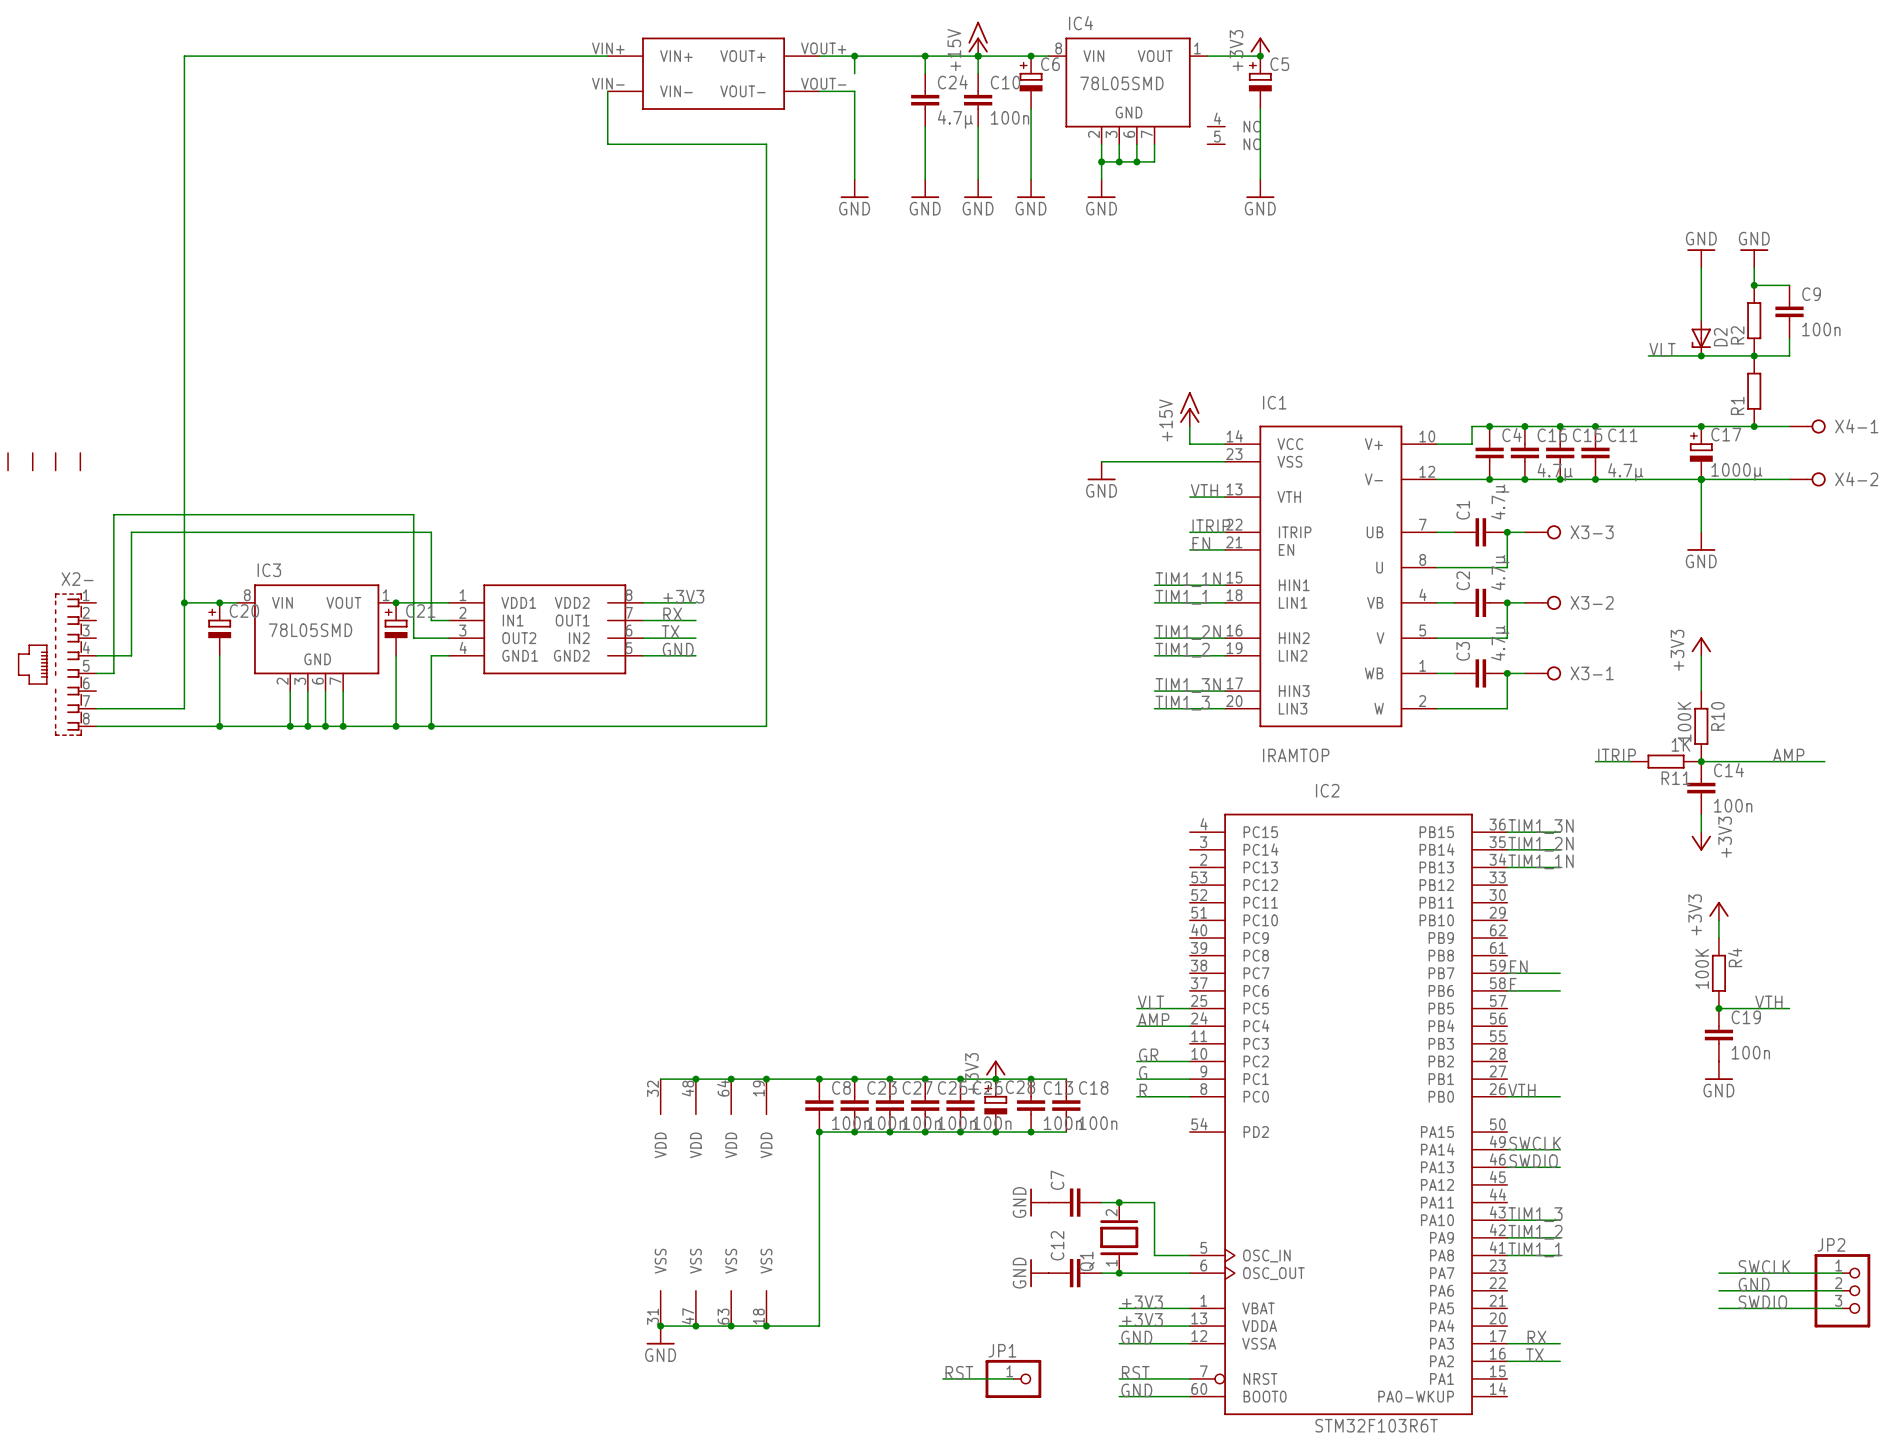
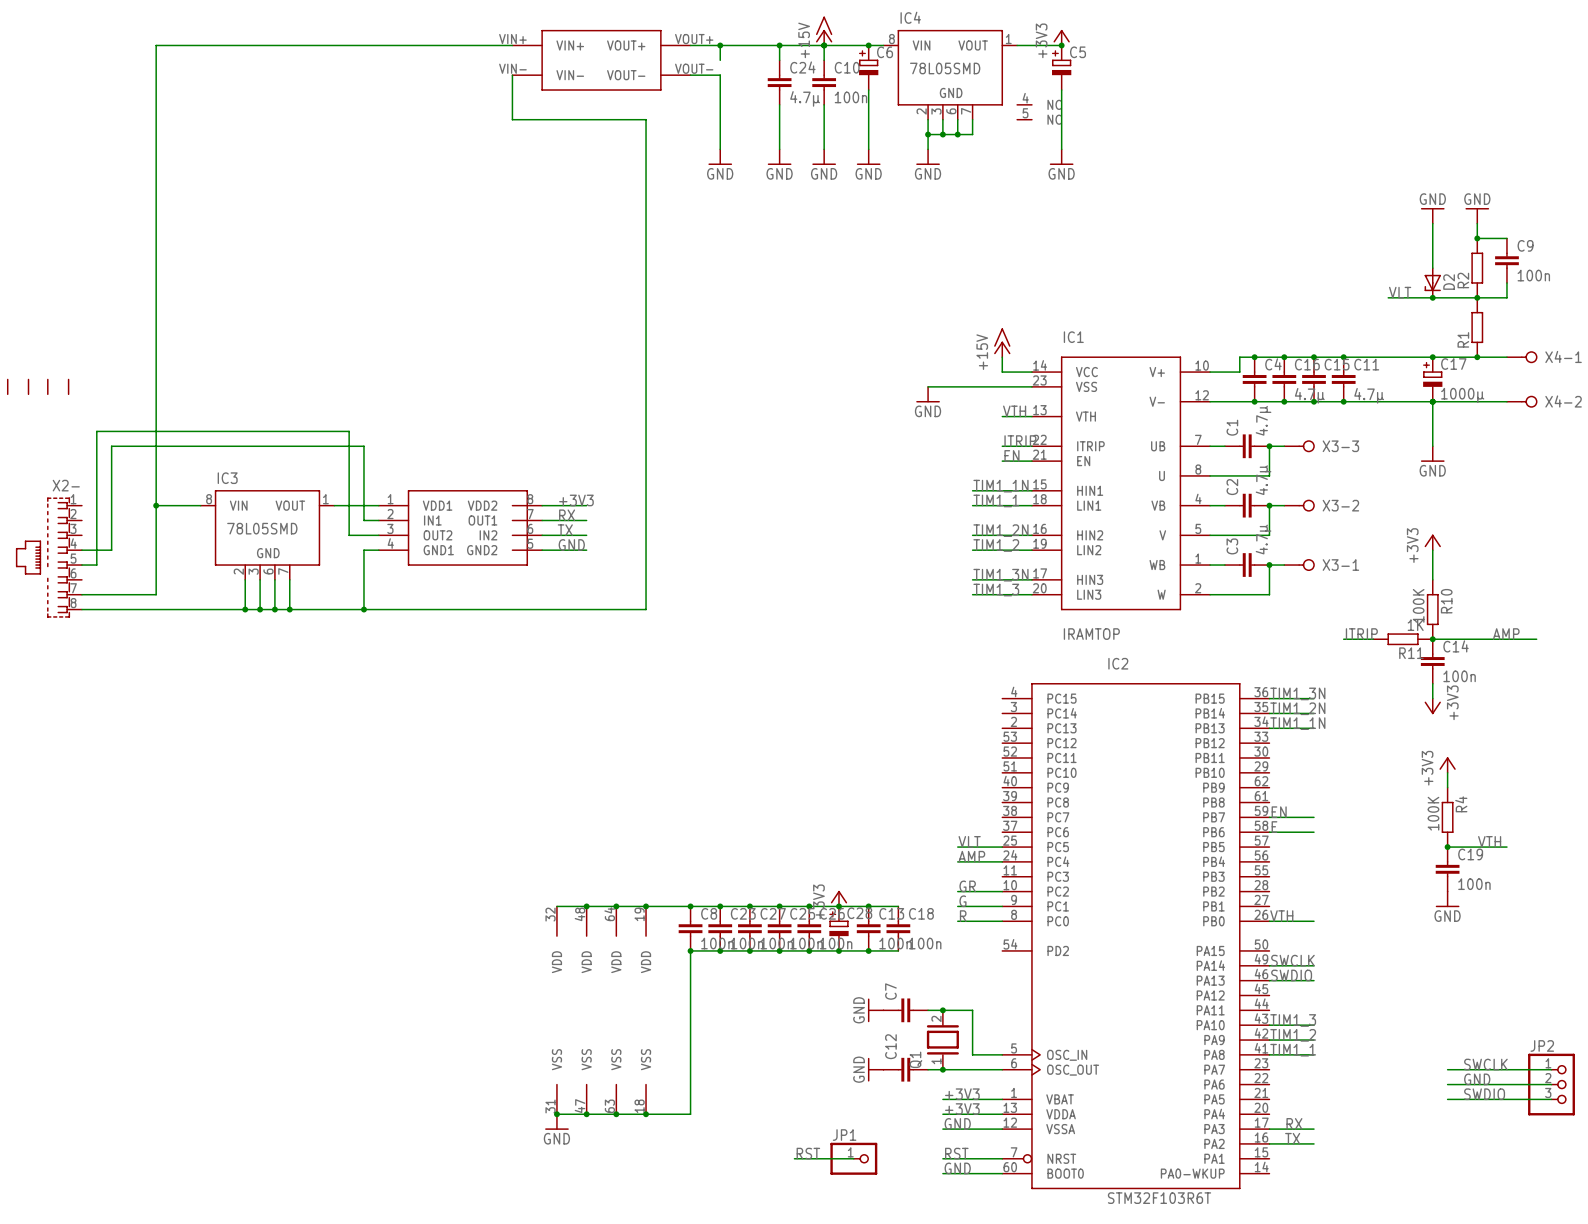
junction: (219, 602) -> none
junction: (396, 602) -> none
C20: (219, 629) -> none
C21: (396, 629) -> none
wire: (219, 655) (219, 726) -> none
wire: (396, 655) (396, 726) -> none
junction: (219, 726) -> none
junction: (396, 726) -> none

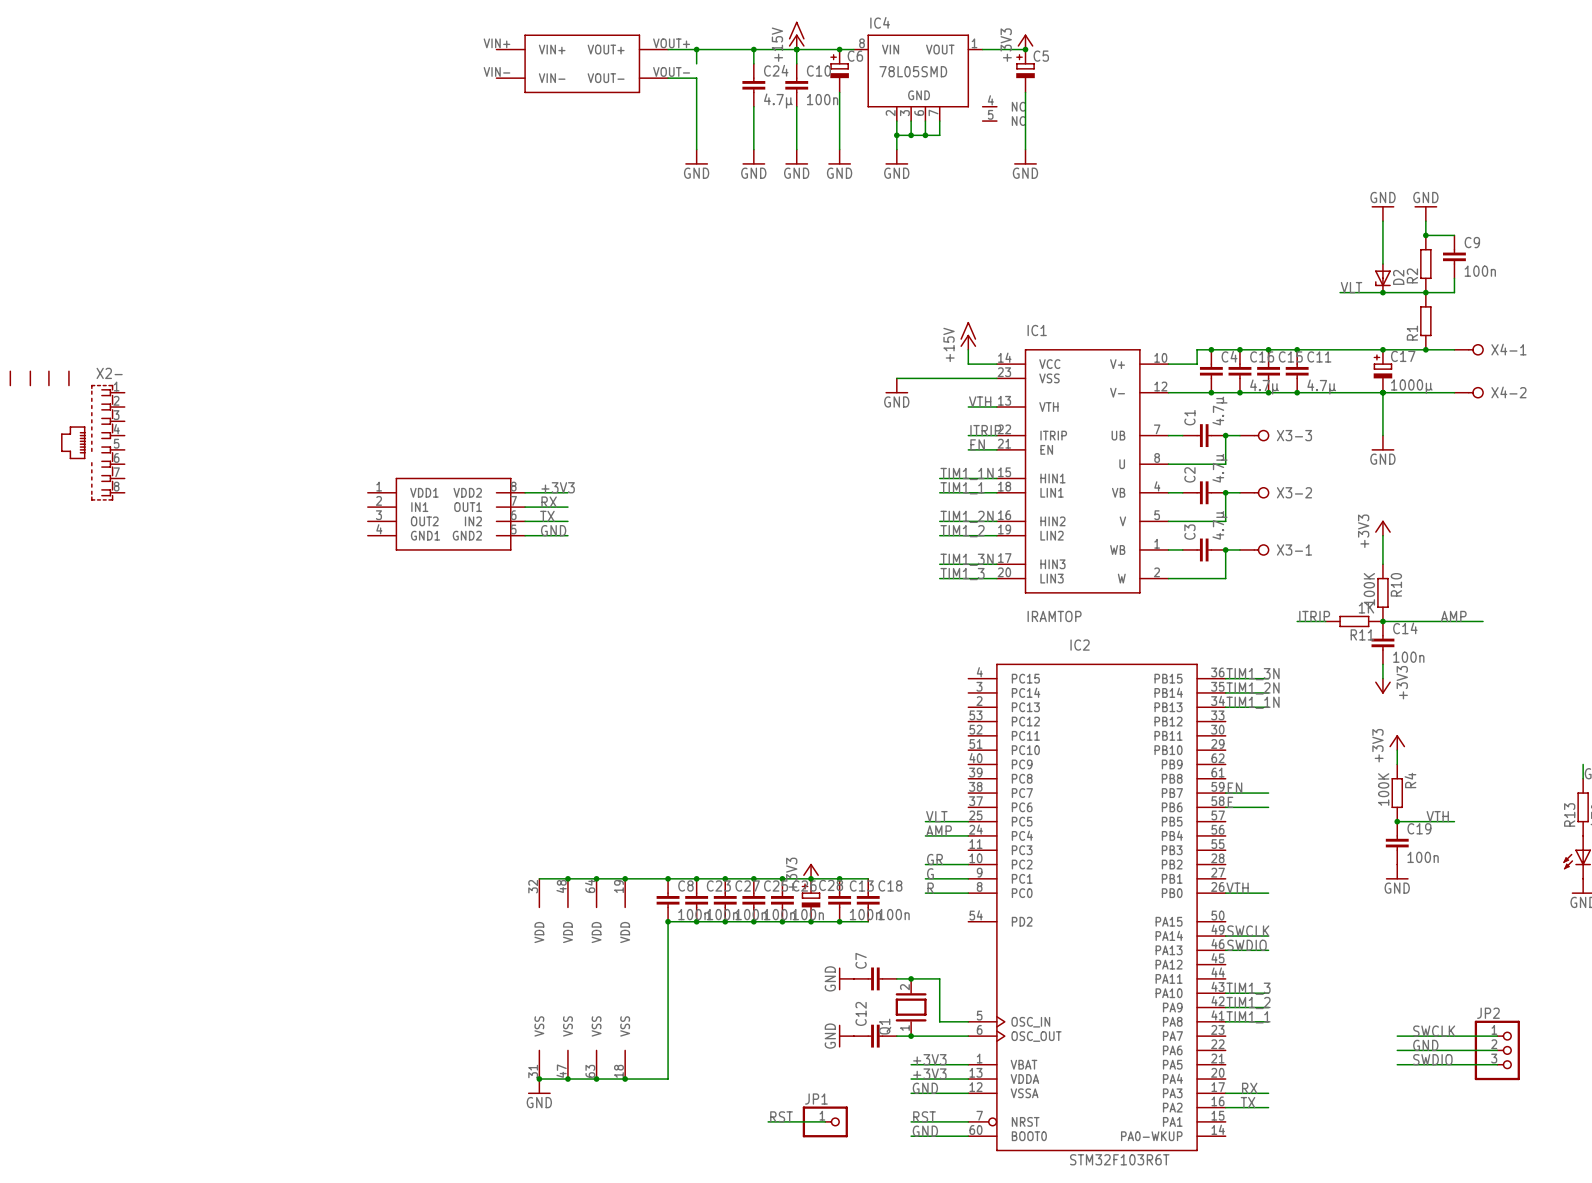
wire: (512, 45) (156, 45) (156, 594) (81, 594) -> none
wire: (512, 75) (512, 119) (646, 119) (646, 609) (81, 609) -> none
wire: (156, 505) (200, 505) -> none
junction: (156, 505) -> none
wire: (334, 505) (378, 505) -> none
wire: (378, 520) (363, 520) (363, 446) (111, 446) (111, 550) (81, 550) -> none
IC3: 78L05SMD (267, 534) -> none
wire: (378, 535) (349, 535) (349, 431) (96, 431) (96, 565) (81, 565) -> none
wire: (378, 550) (363, 550) (363, 609) -> none
X2- position: (49, 557) -> (92, 442)
wire: (245, 579) (245, 609) -> none
wire: (260, 579) (260, 609) -> none
wire: (274, 579) (274, 609) -> none
wire: (289, 579) (289, 609) -> none
junction: (245, 609) -> none
junction: (260, 609) -> none
junction: (274, 609) -> none
junction: (289, 609) -> none
junction: (363, 609) -> none

